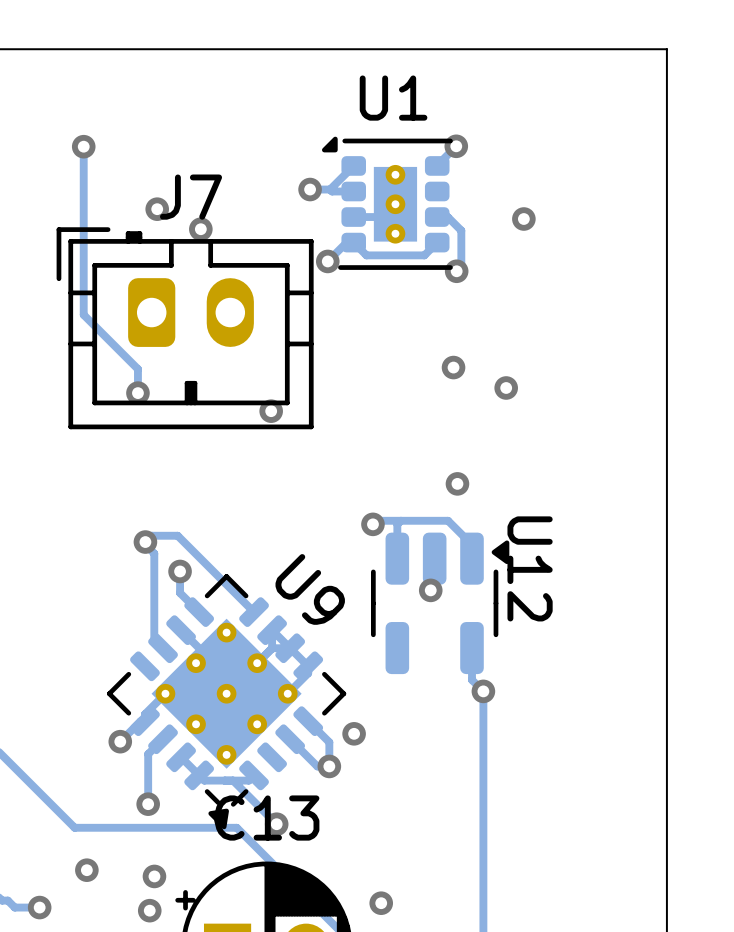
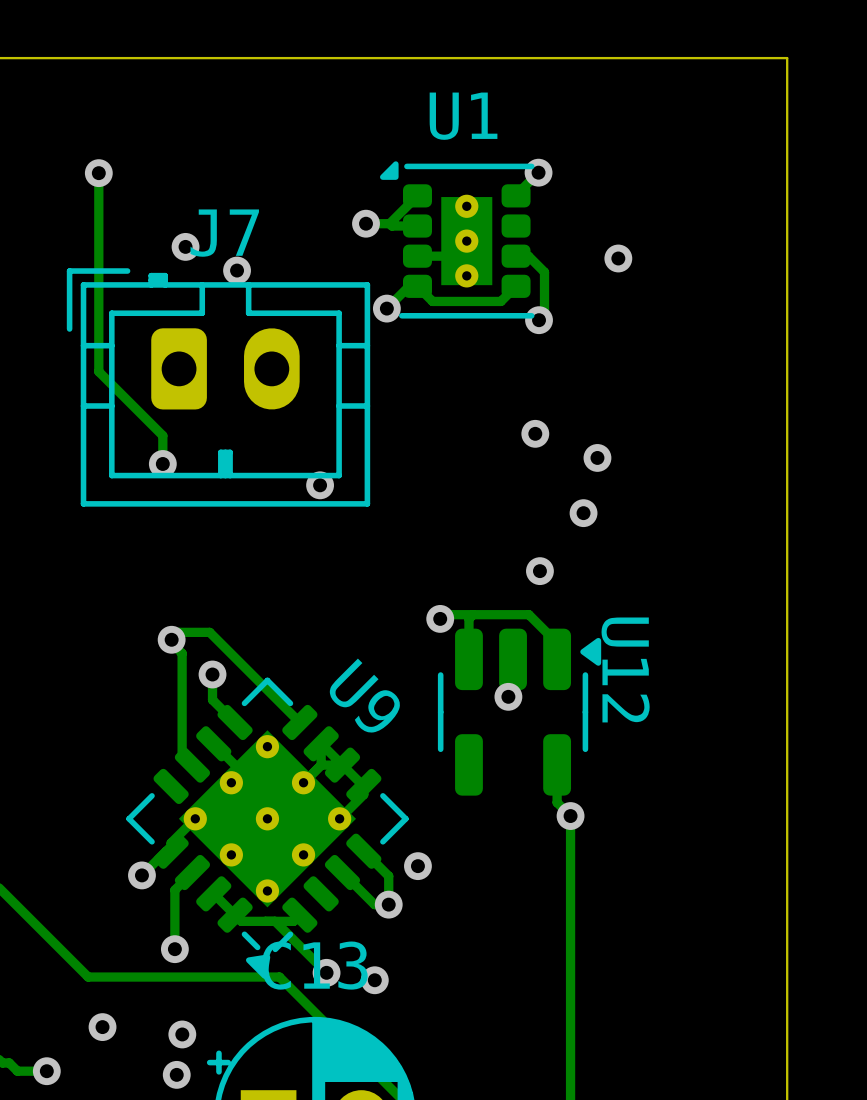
via: none -> (583, 513)
via position: (381, 903) -> (374, 980)

